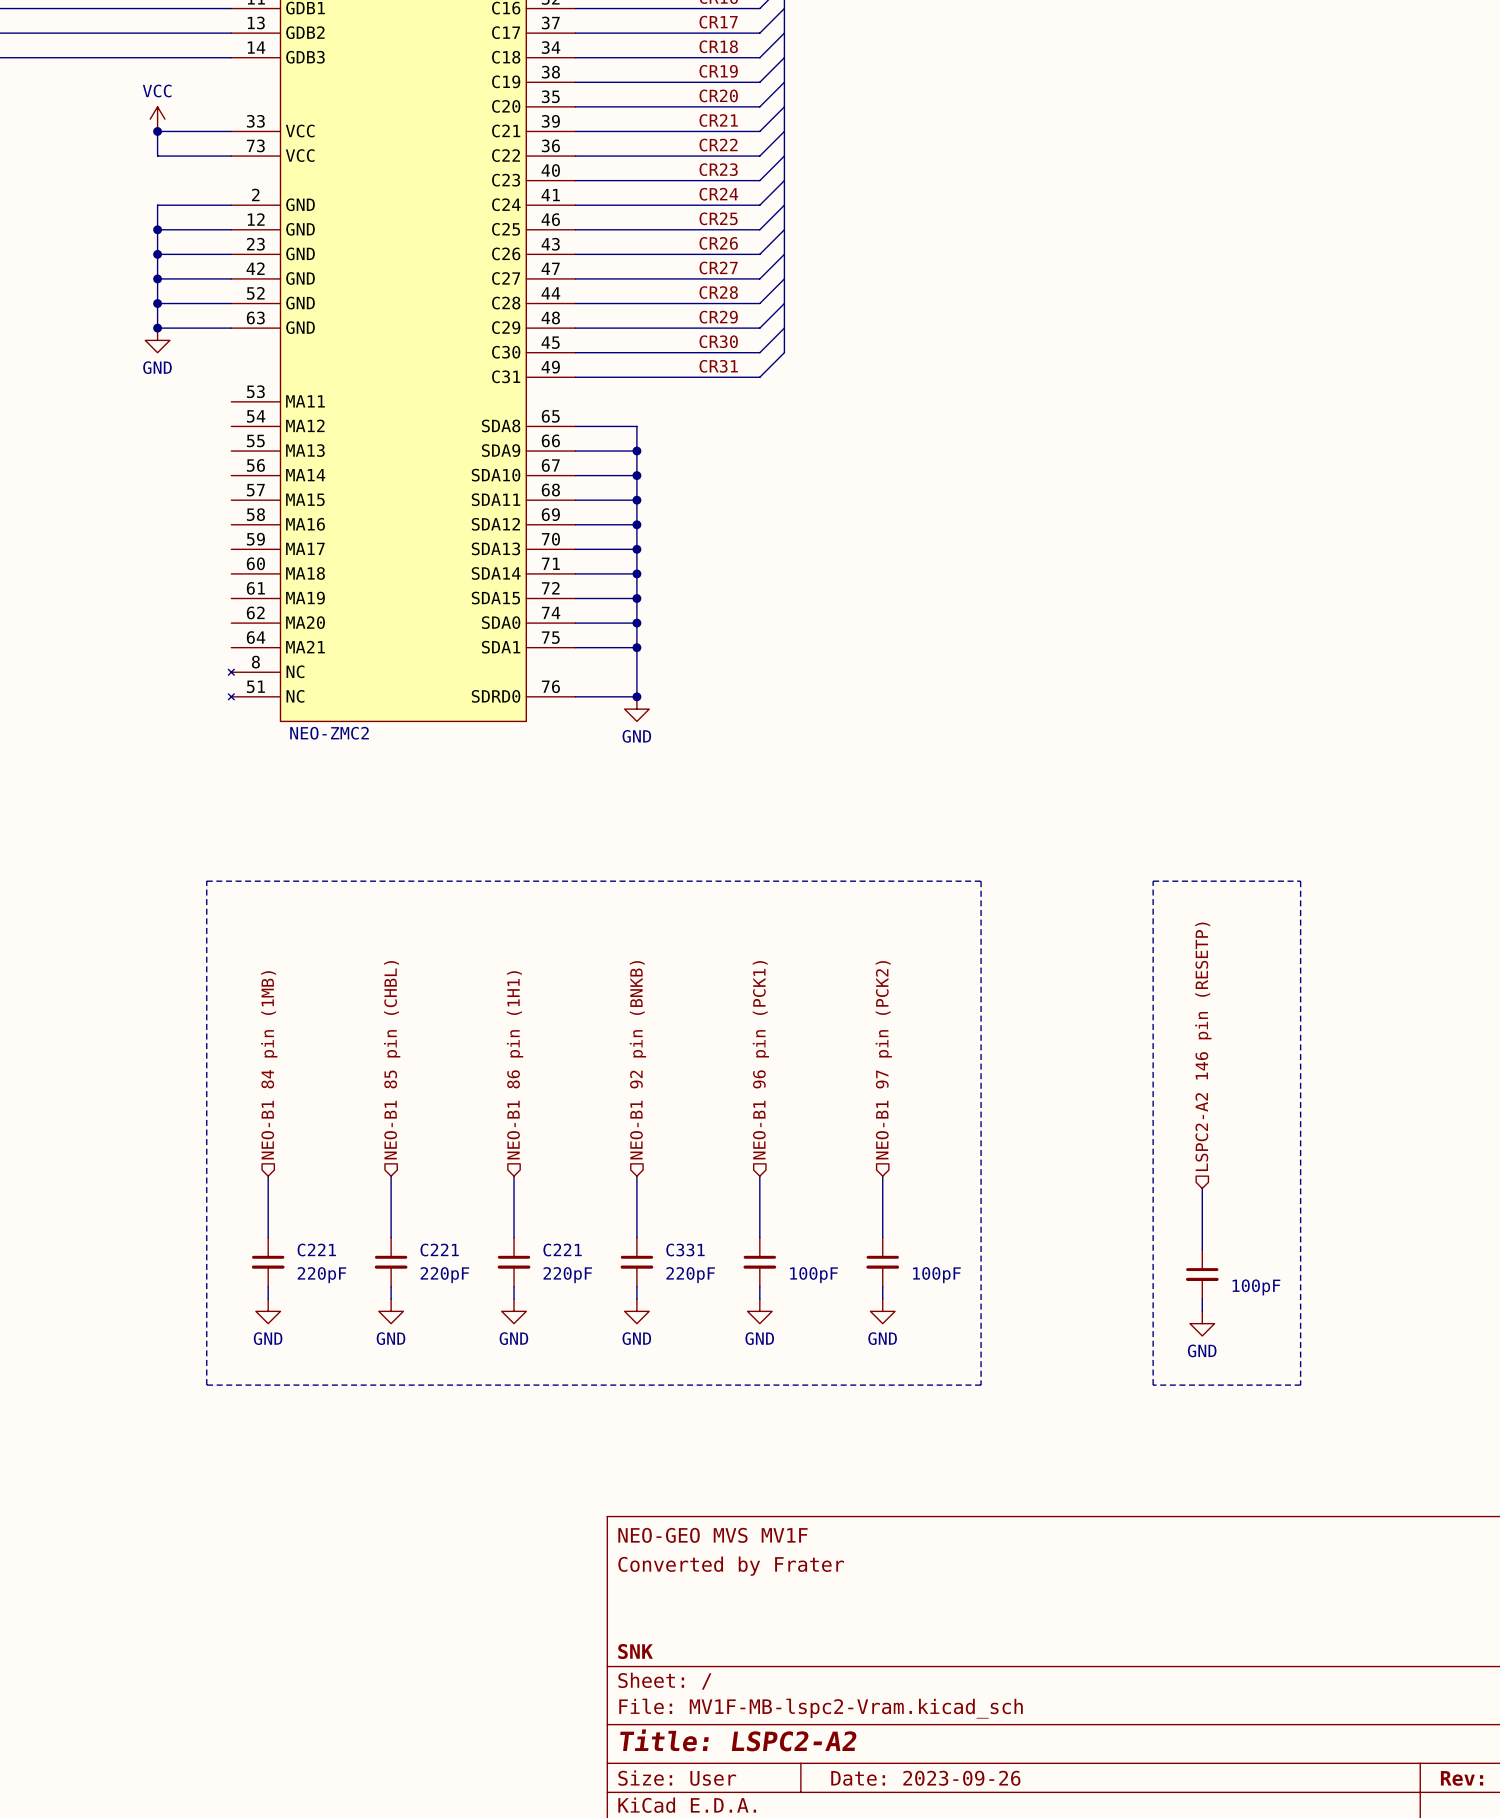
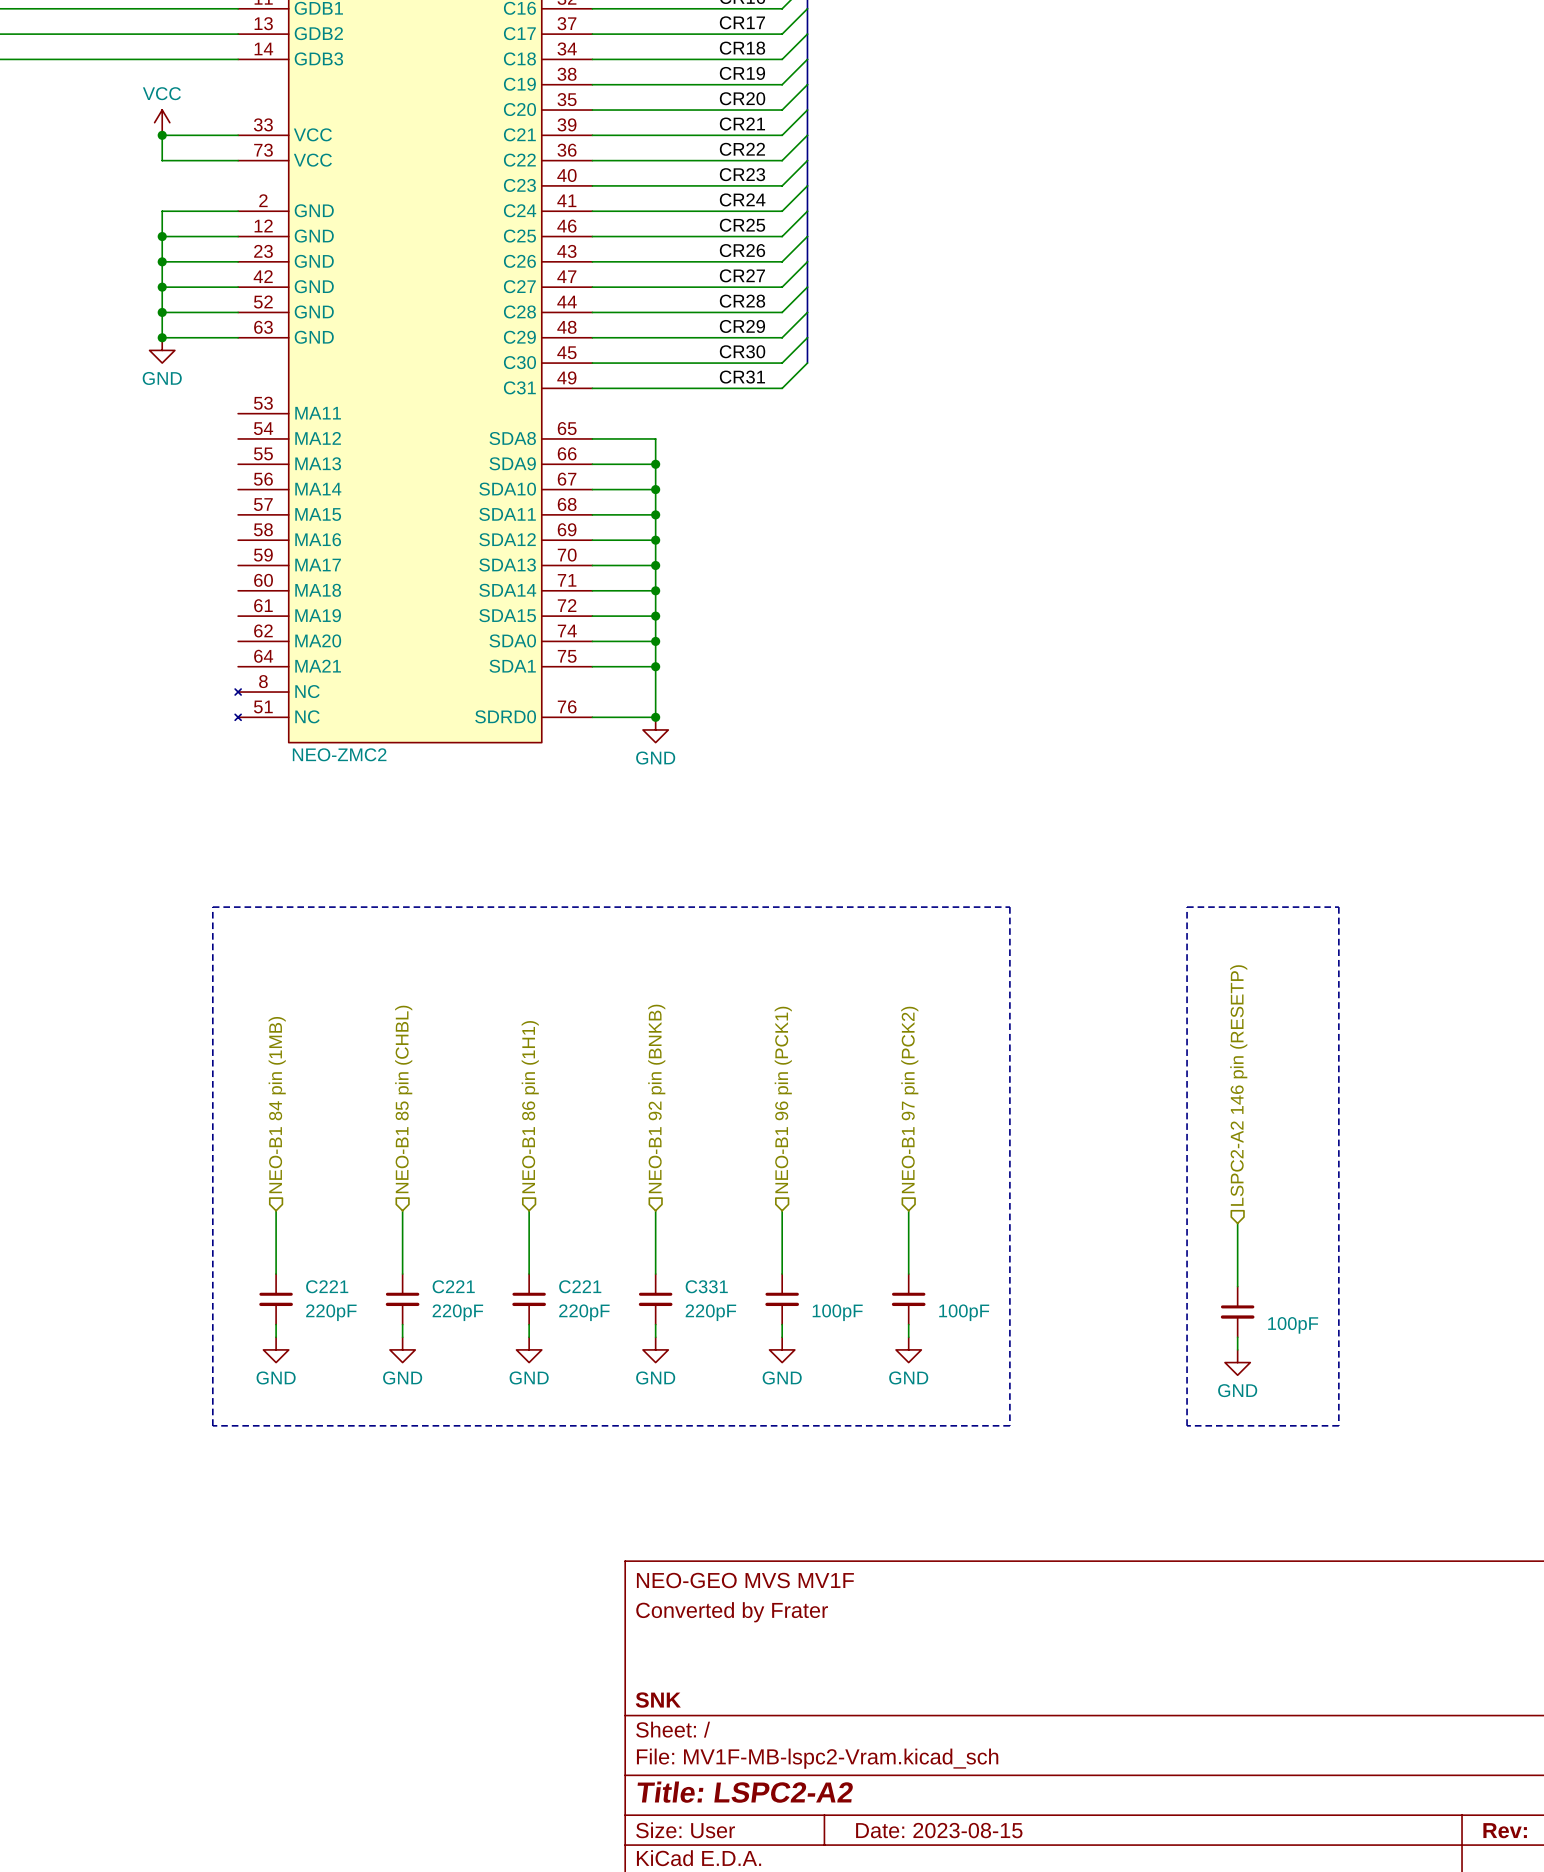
title block: Date: 2023-09-26 (925, 1778) -> Date: 2023-08-15 (939, 1830)

